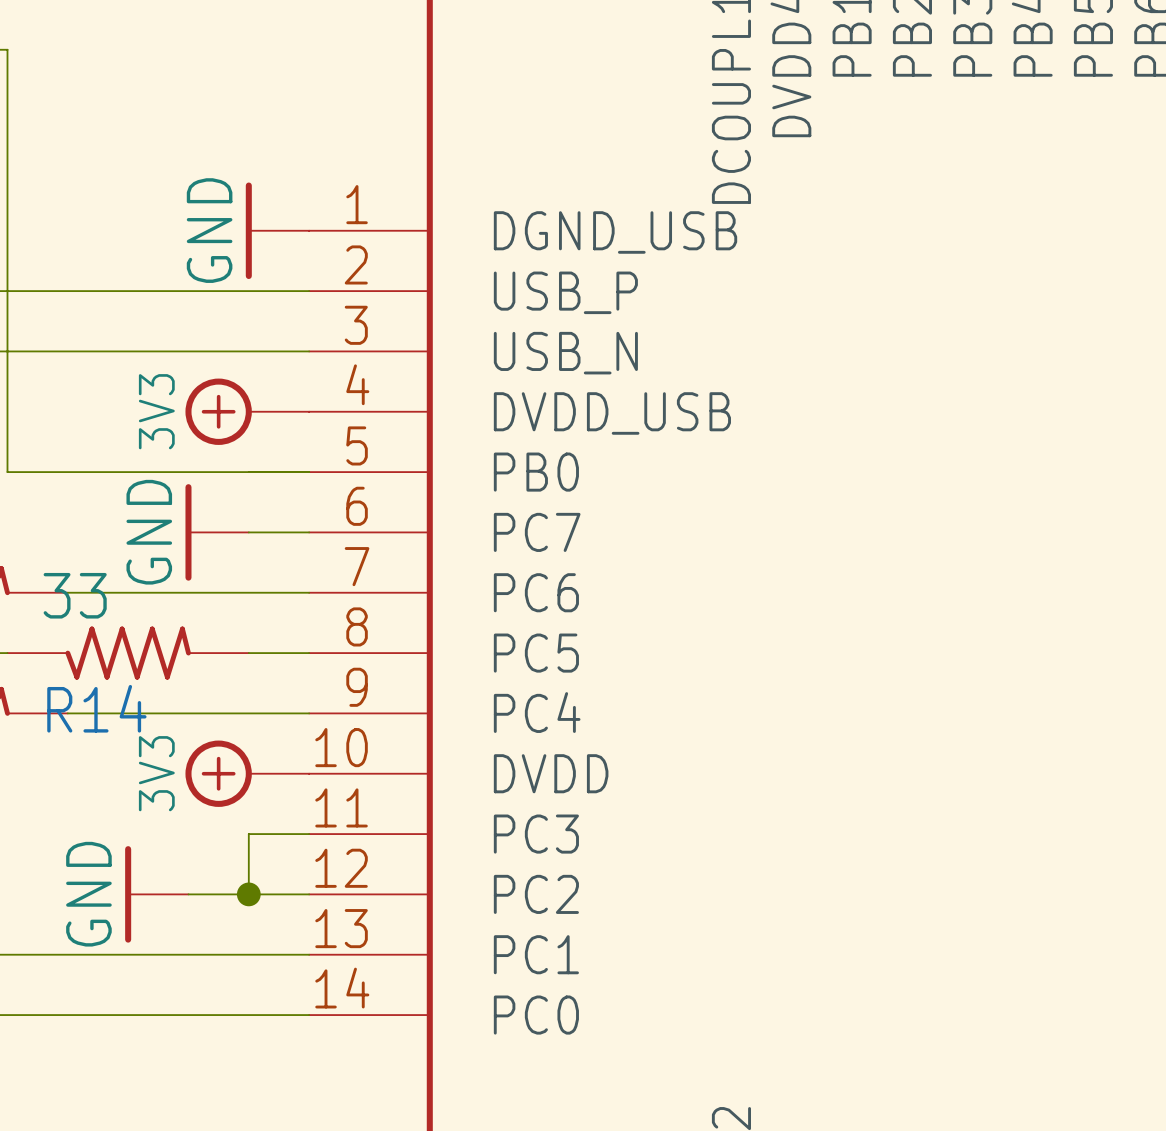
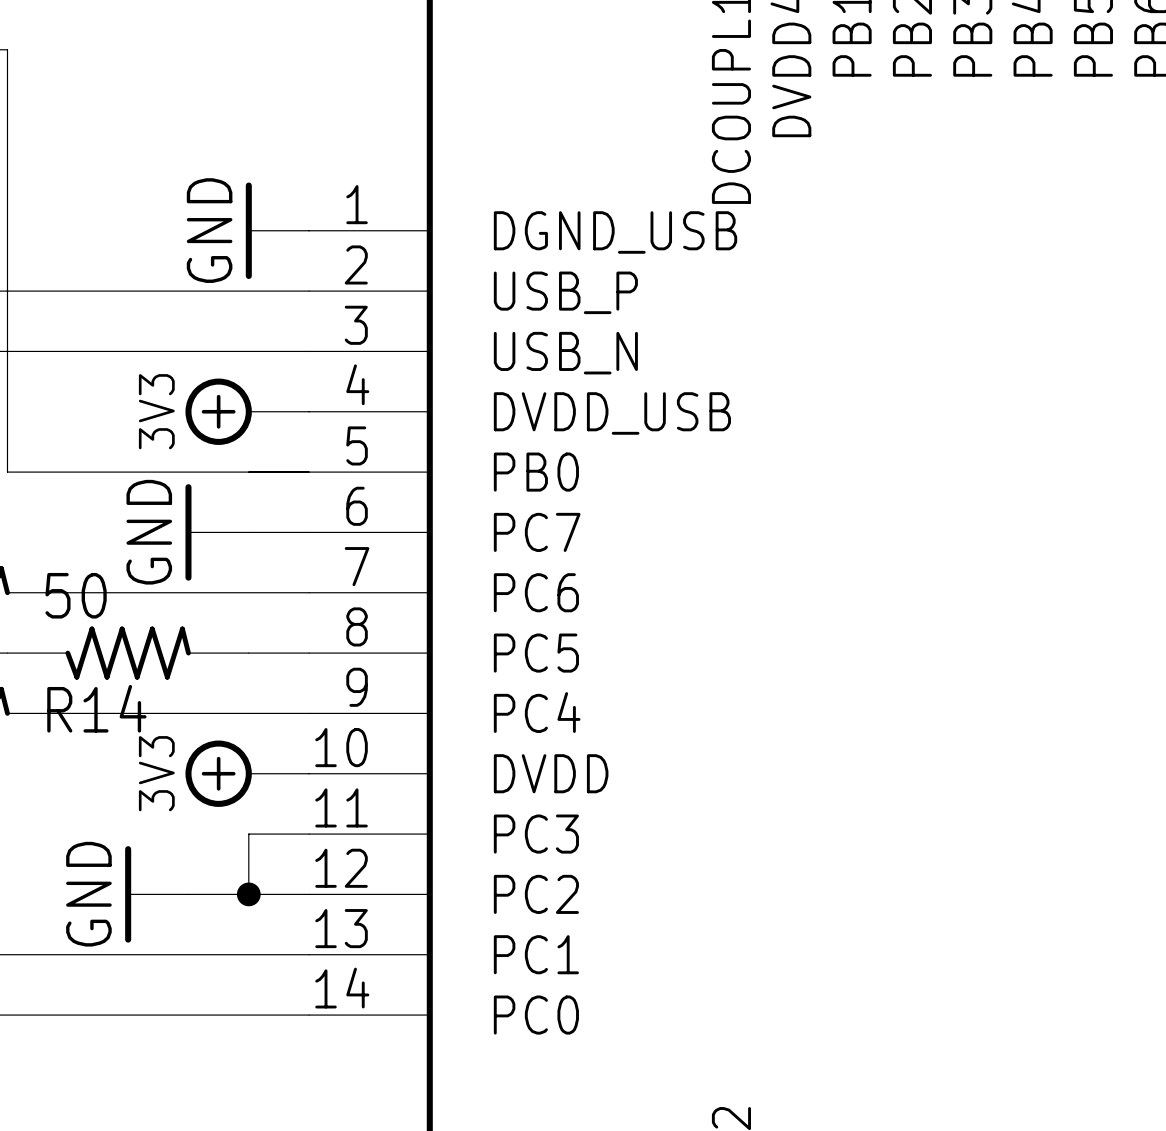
R14 value: 33 (75, 595) -> 50 (76, 595)

